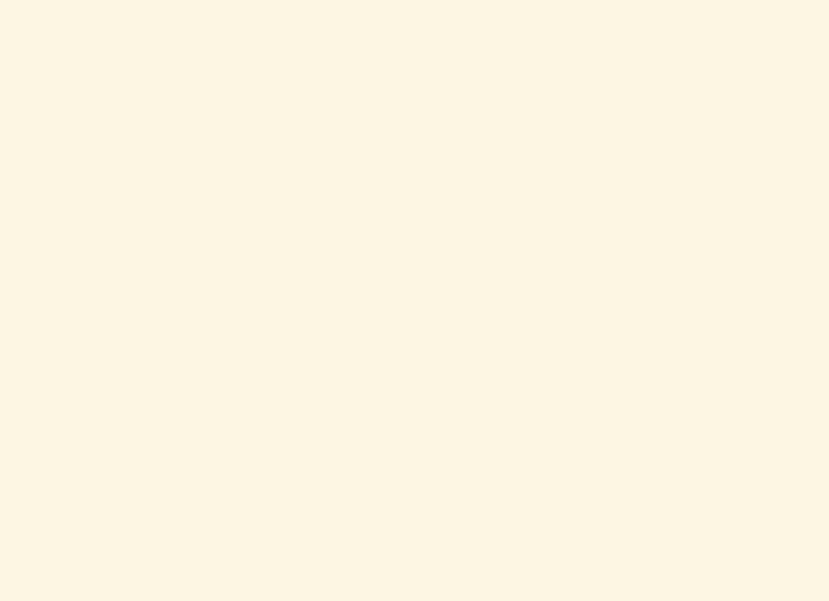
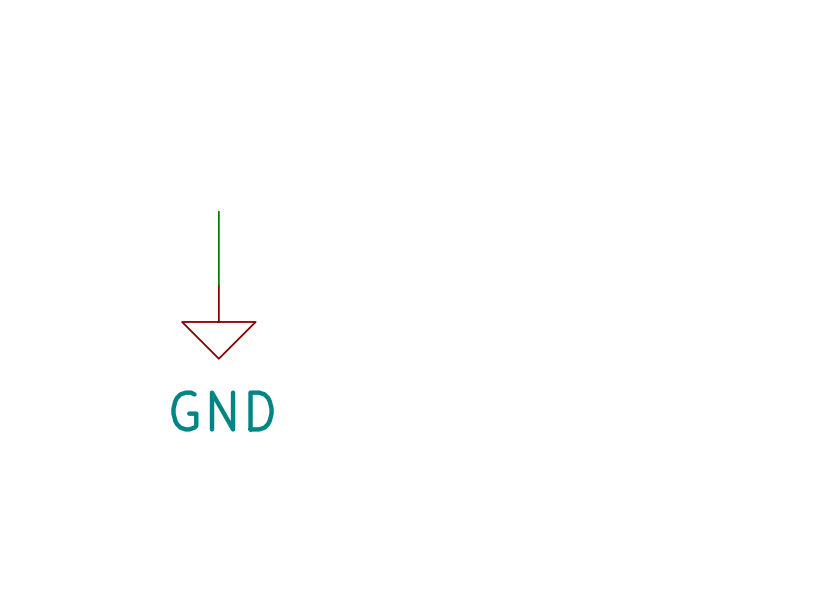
wire: none -> (218, 211) (218, 285)
power symbol: none -> GND (218, 321)

